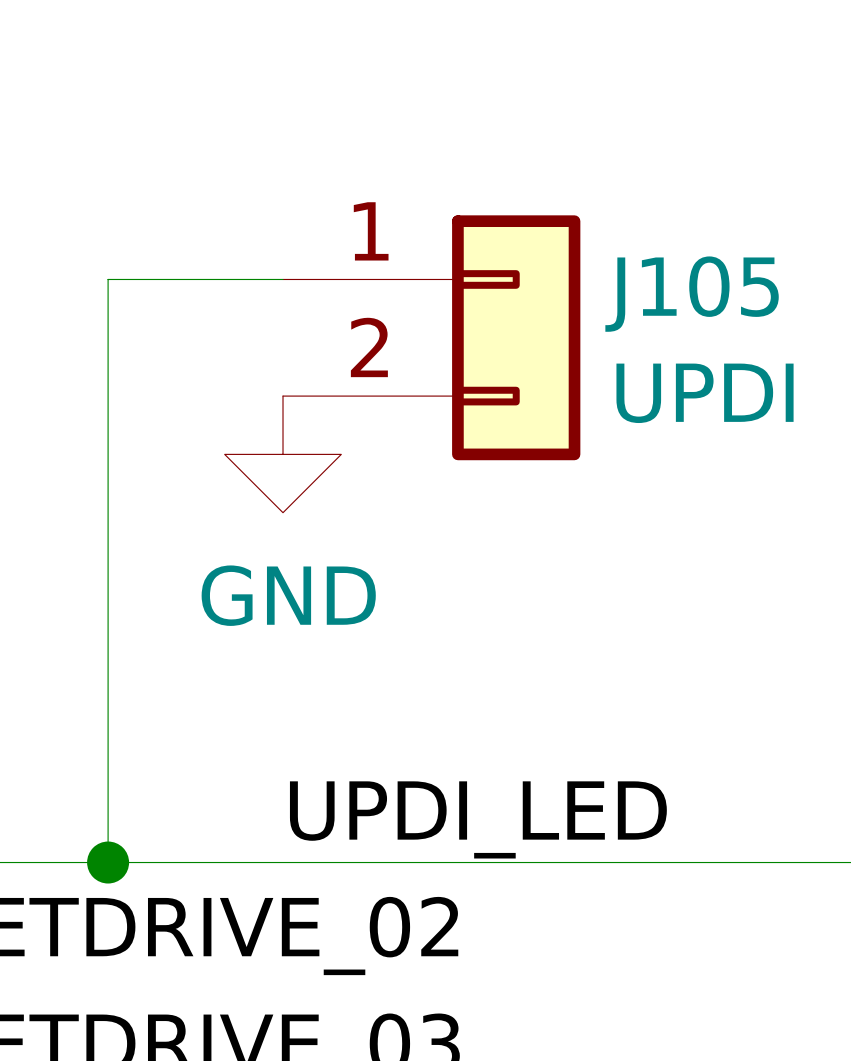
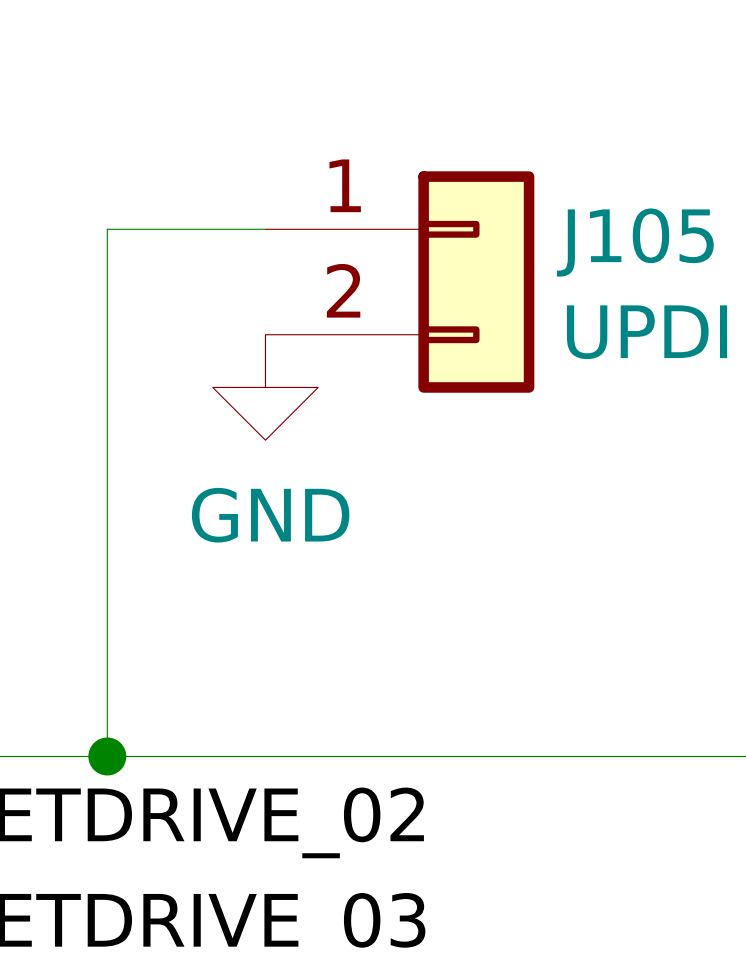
label: UPDI_LED (478, 819) -> none

